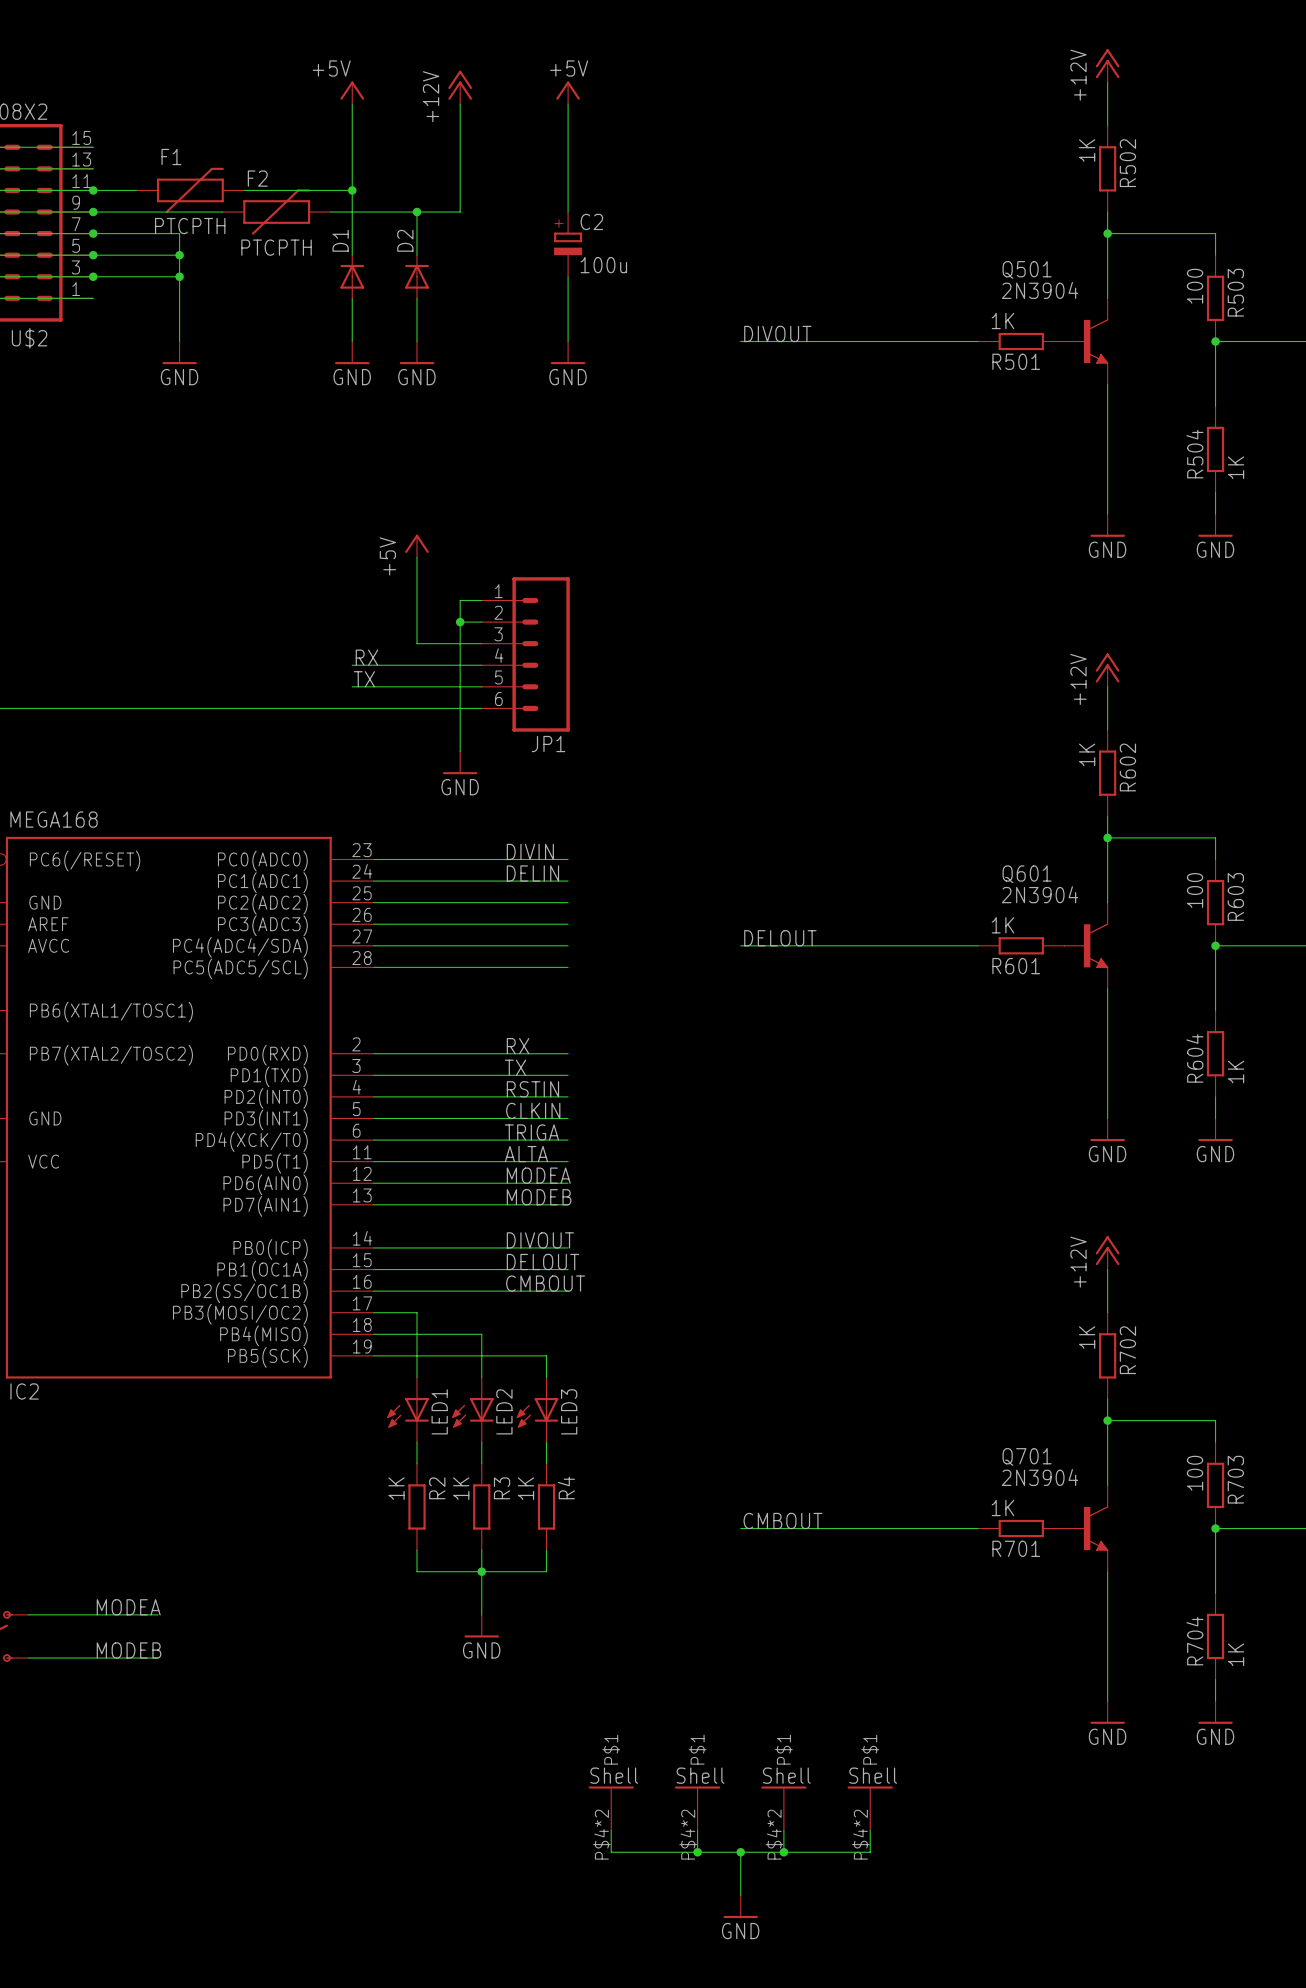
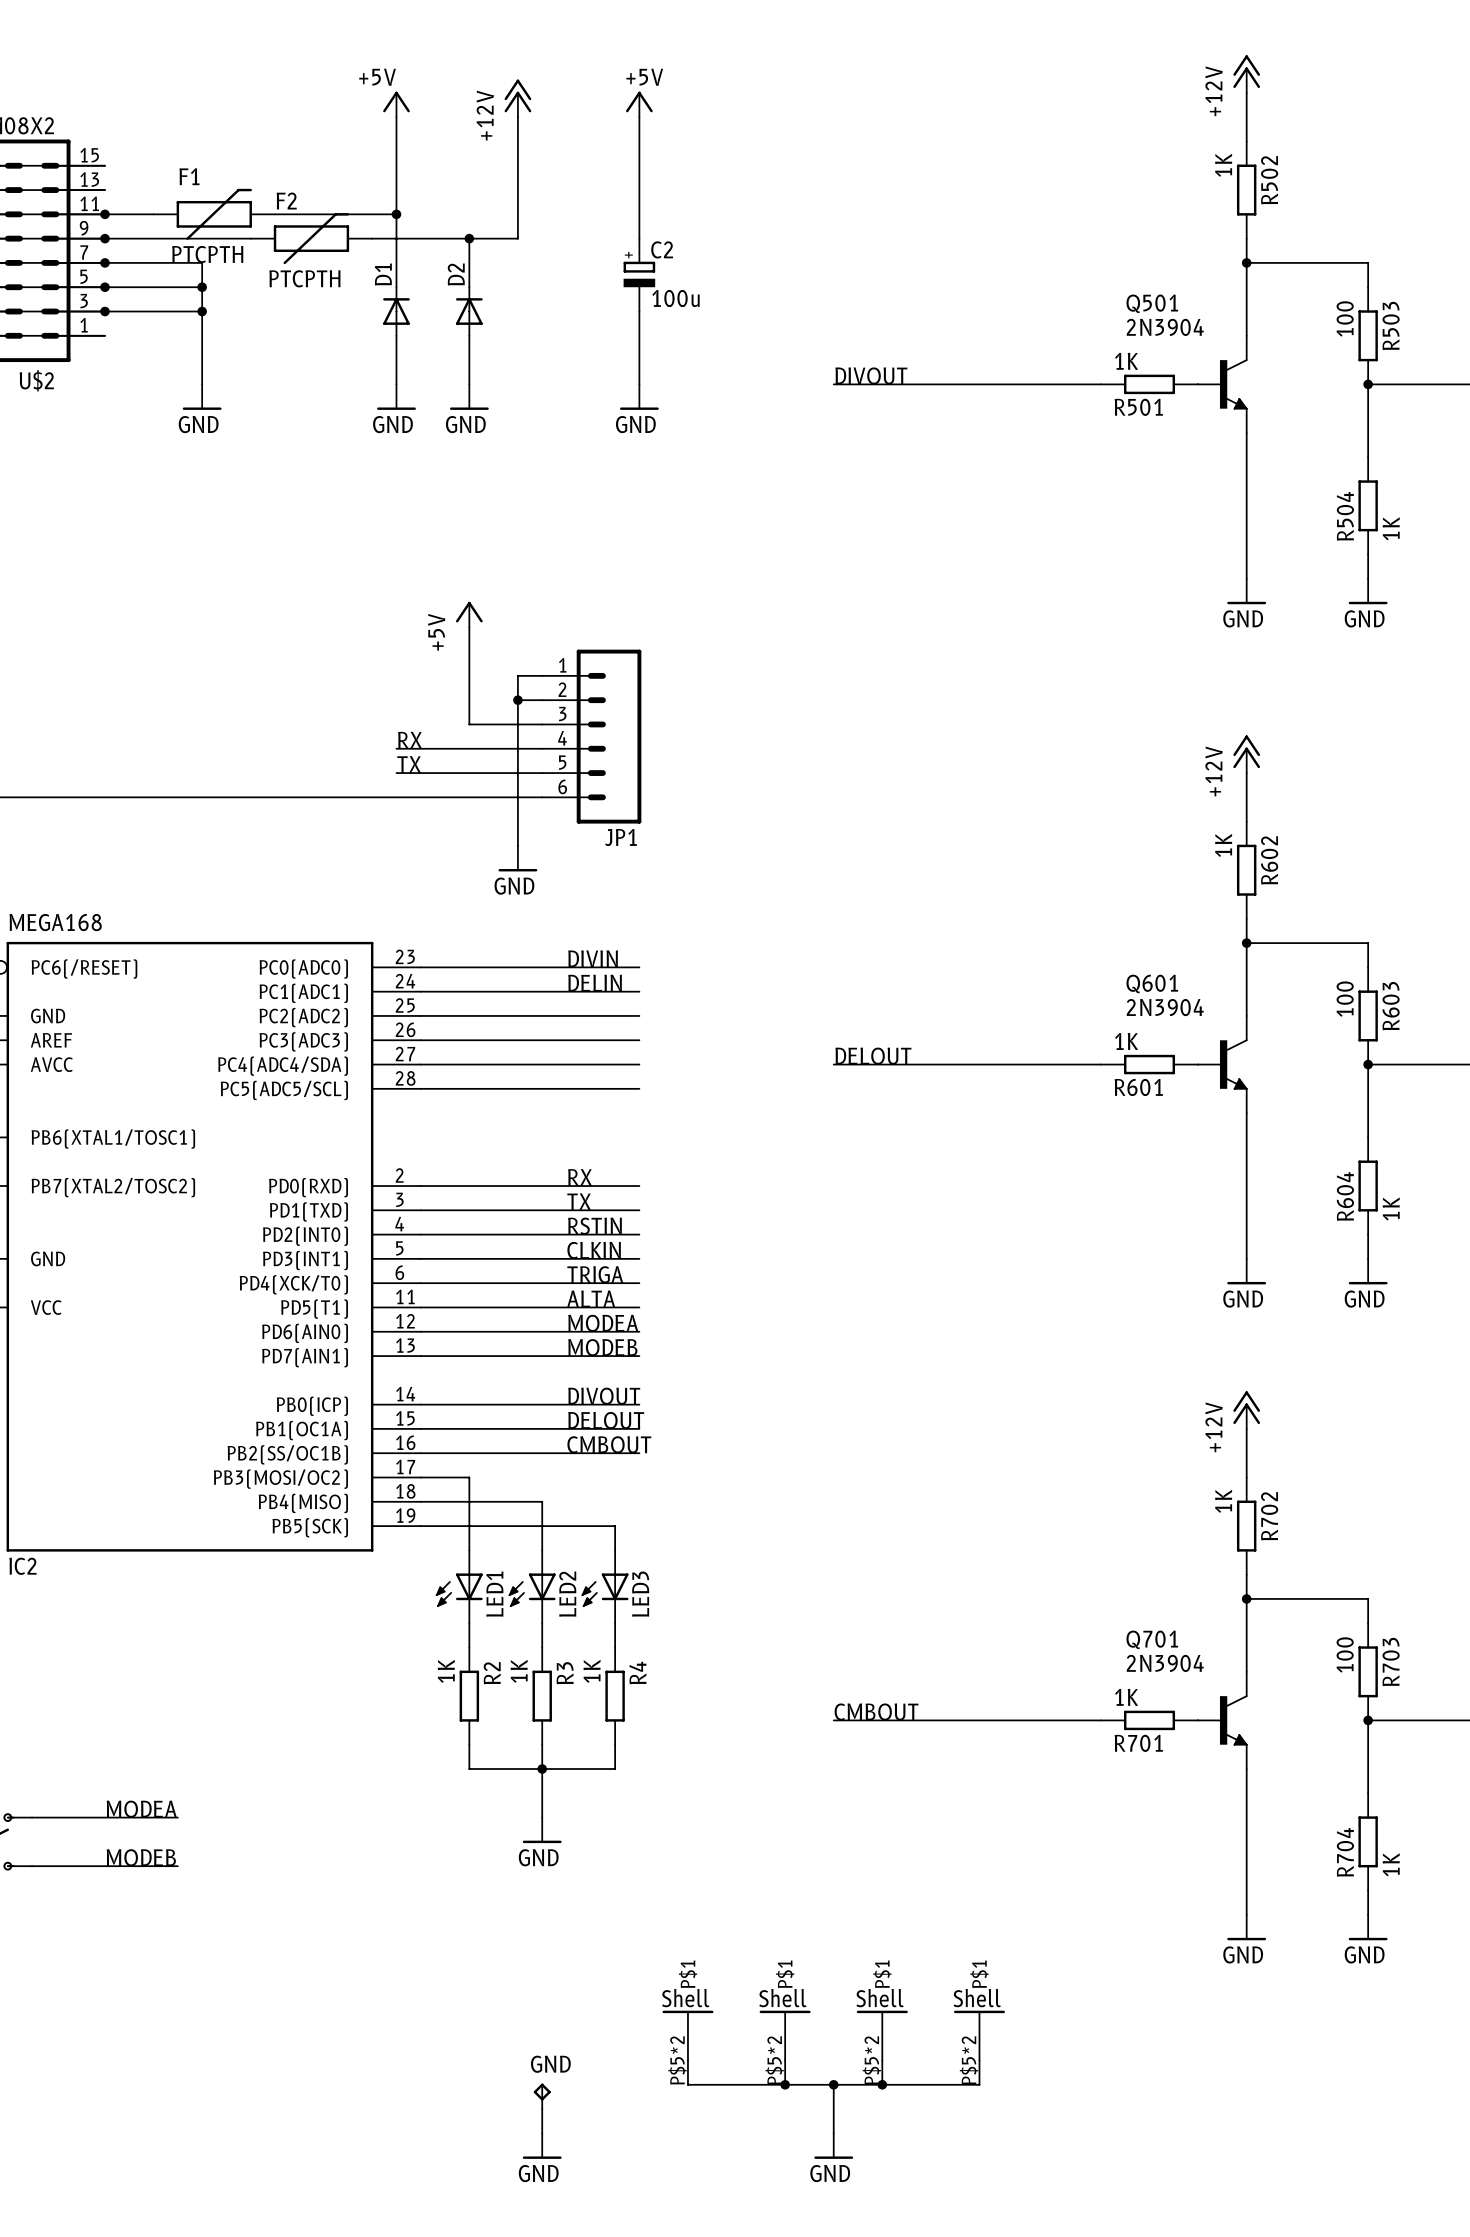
part pin number: P$4*2 (601, 1834) -> P$5*2 (677, 2060)
part pin number: P$4*2 (688, 1834) -> P$5*2 (774, 2060)
part pin number: P$4*2 (774, 1834) -> P$5*2 (871, 2060)
part pin number: P$4*2 (860, 1834) -> P$5*2 (968, 2060)
GND: none -> (542, 2096)
wire: none -> (542, 2109) (542, 2133)
power symbol: none -> GND (542, 2146)

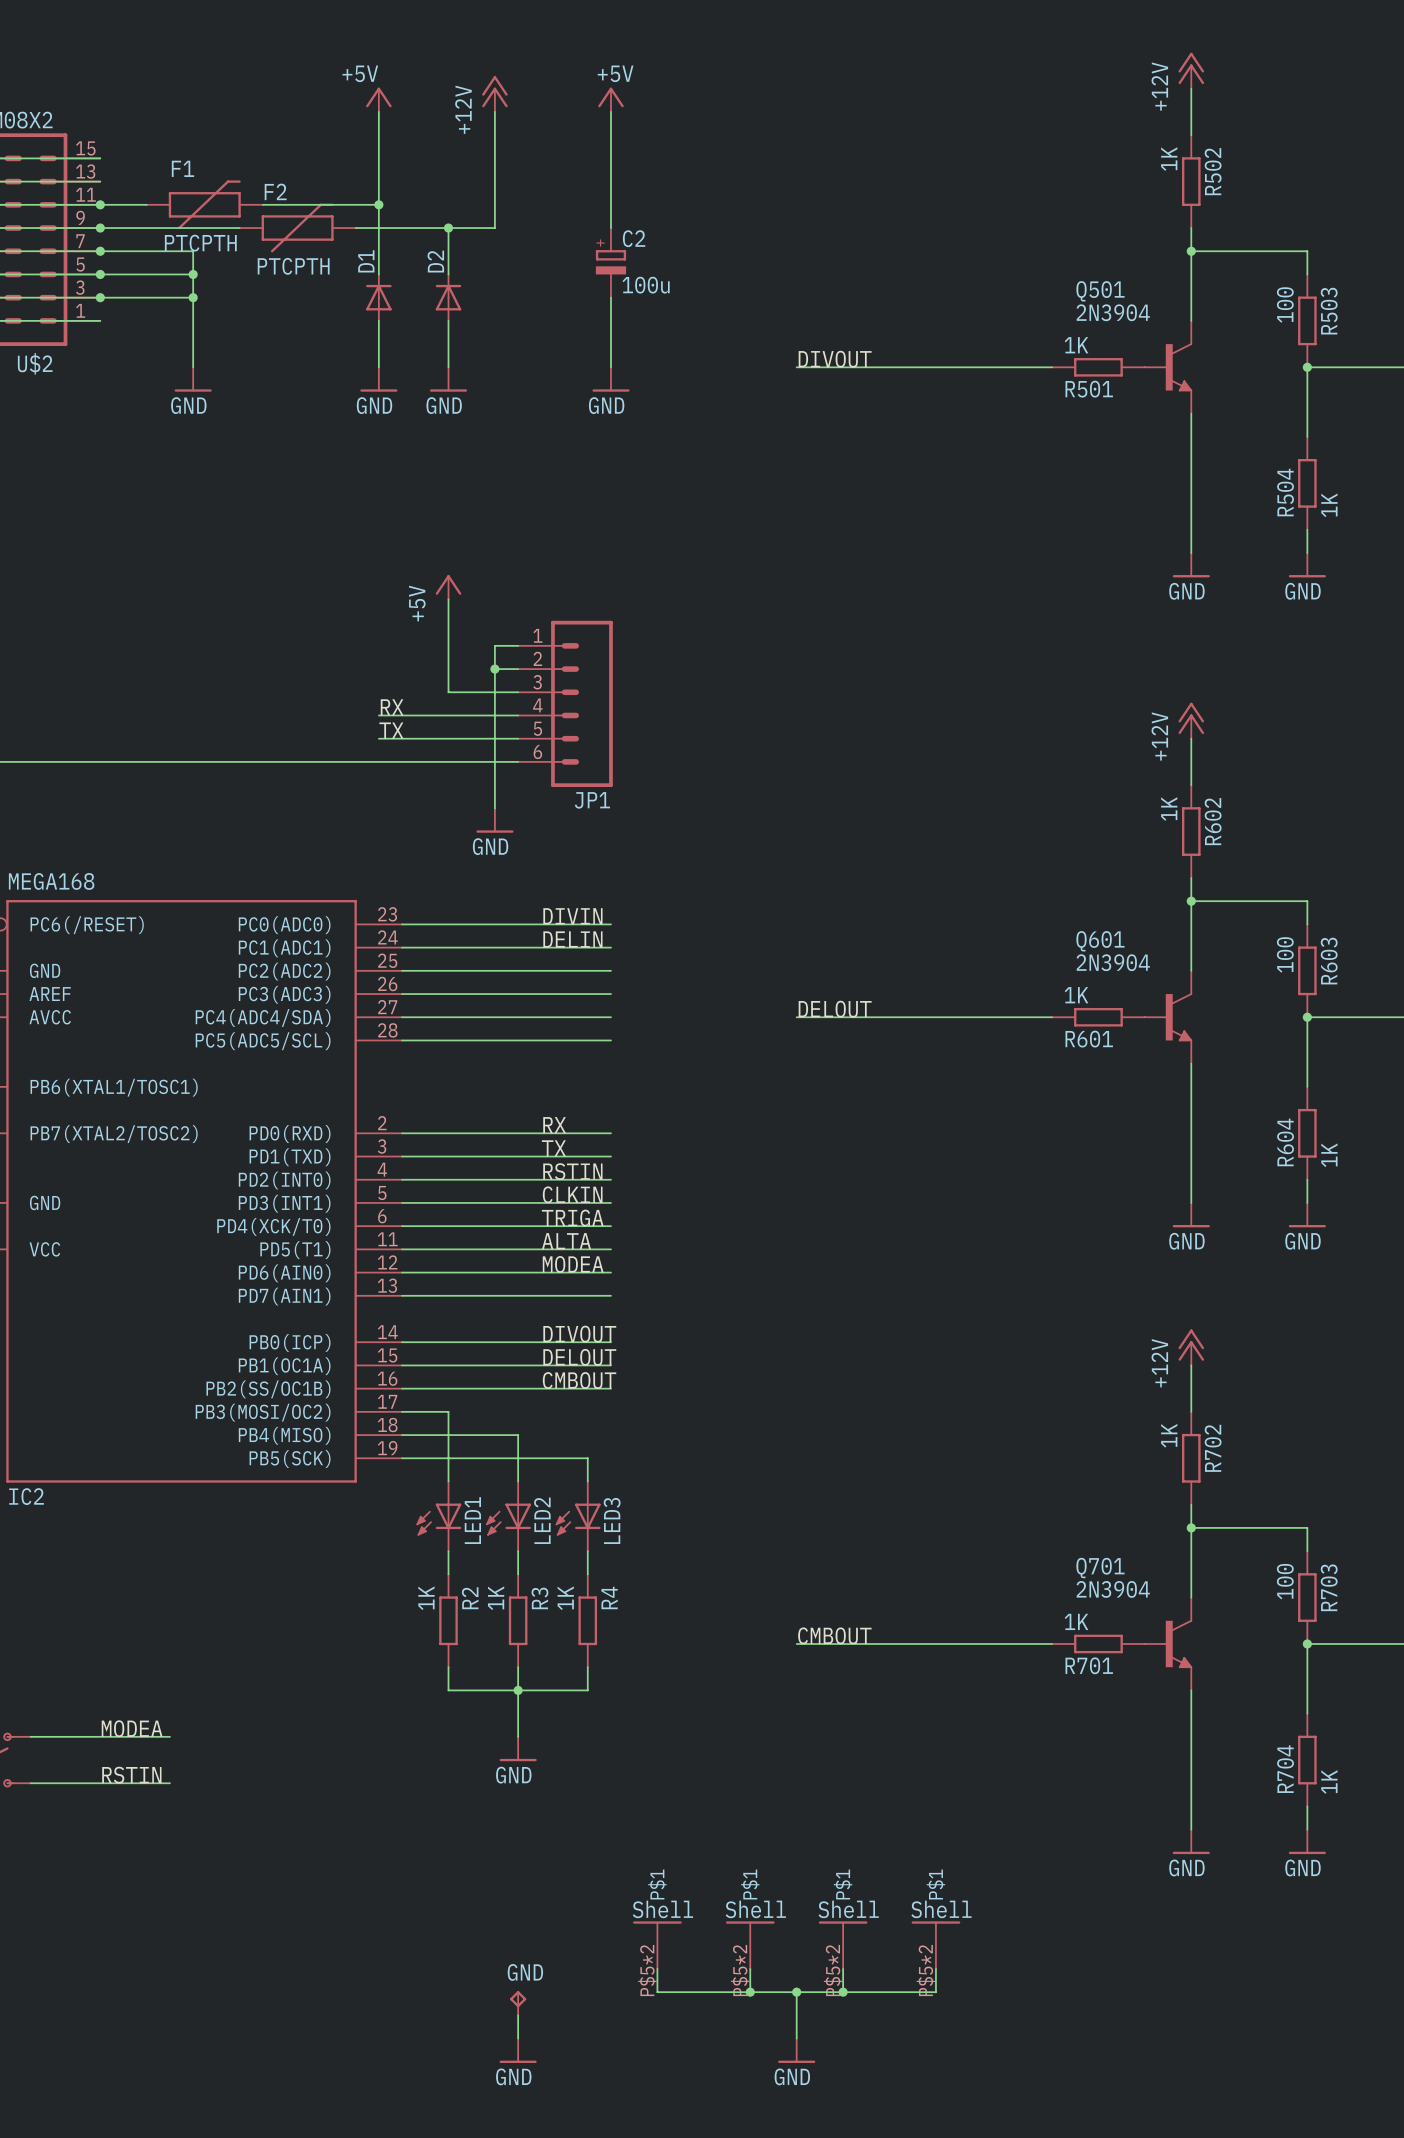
label: MODEB (602, 1347) -> none
label: MODEB (141, 1857) -> RSTIN (131, 1775)

